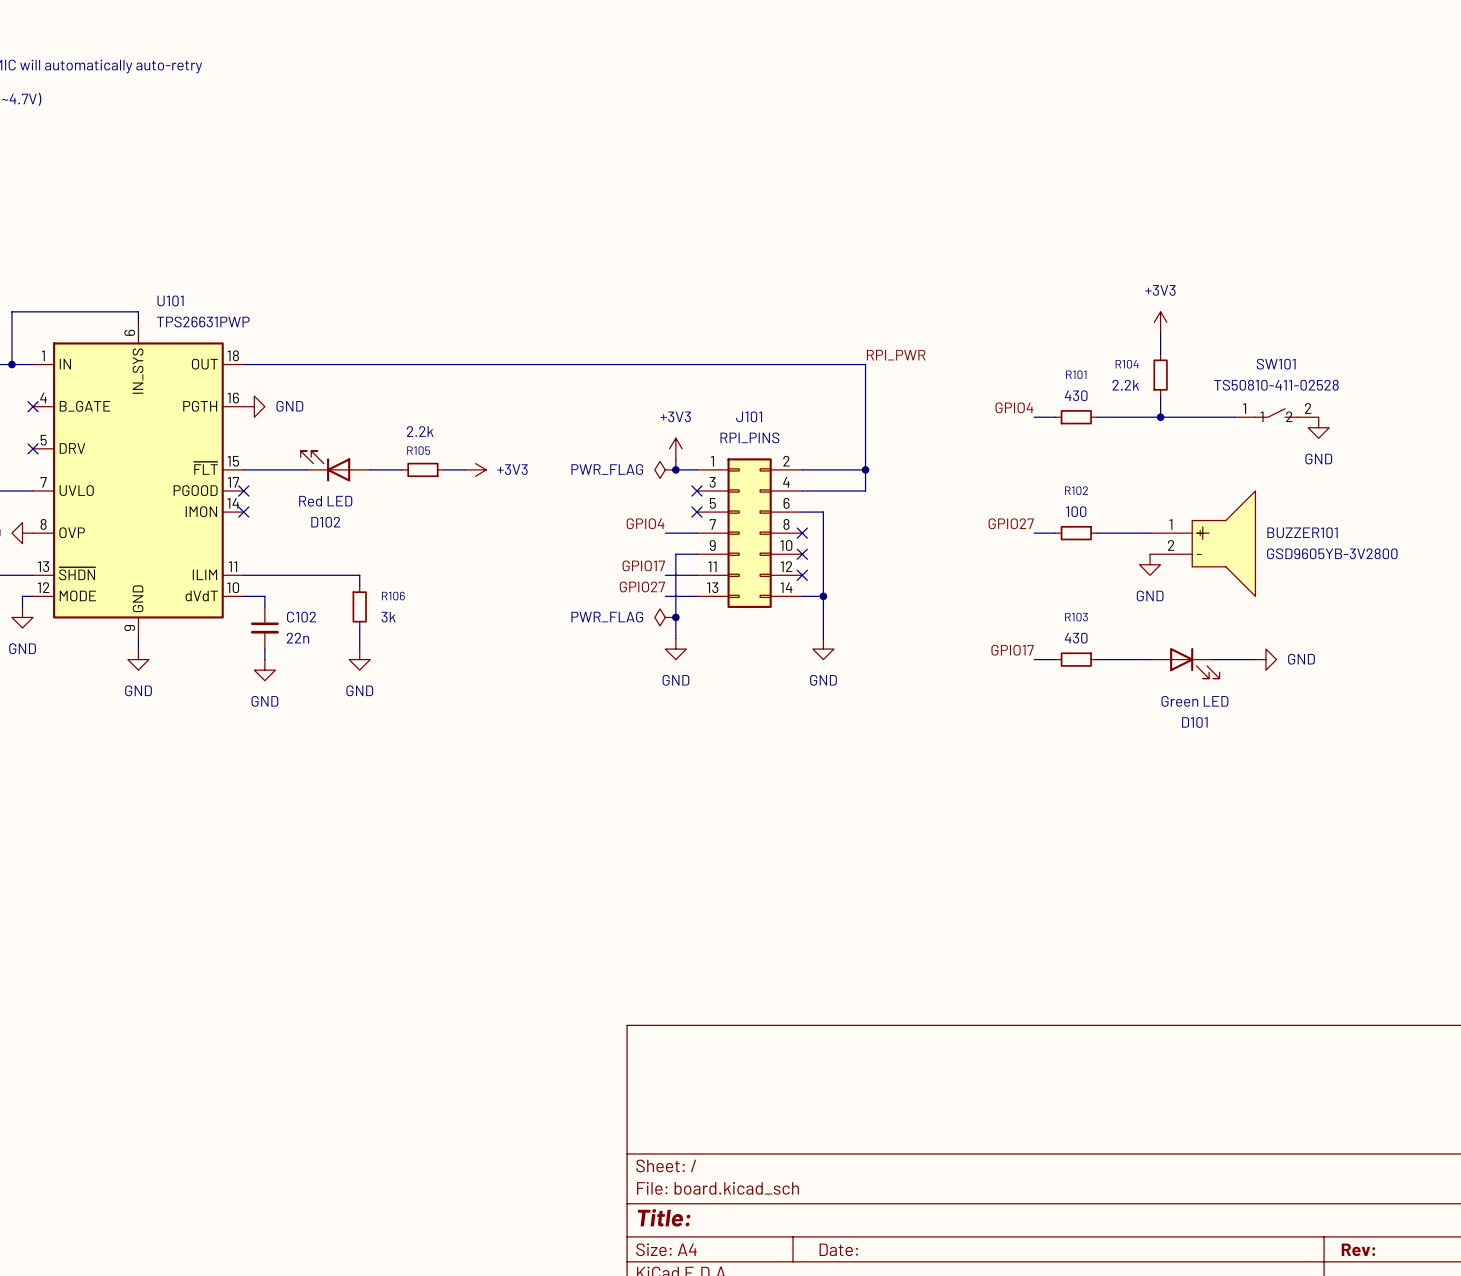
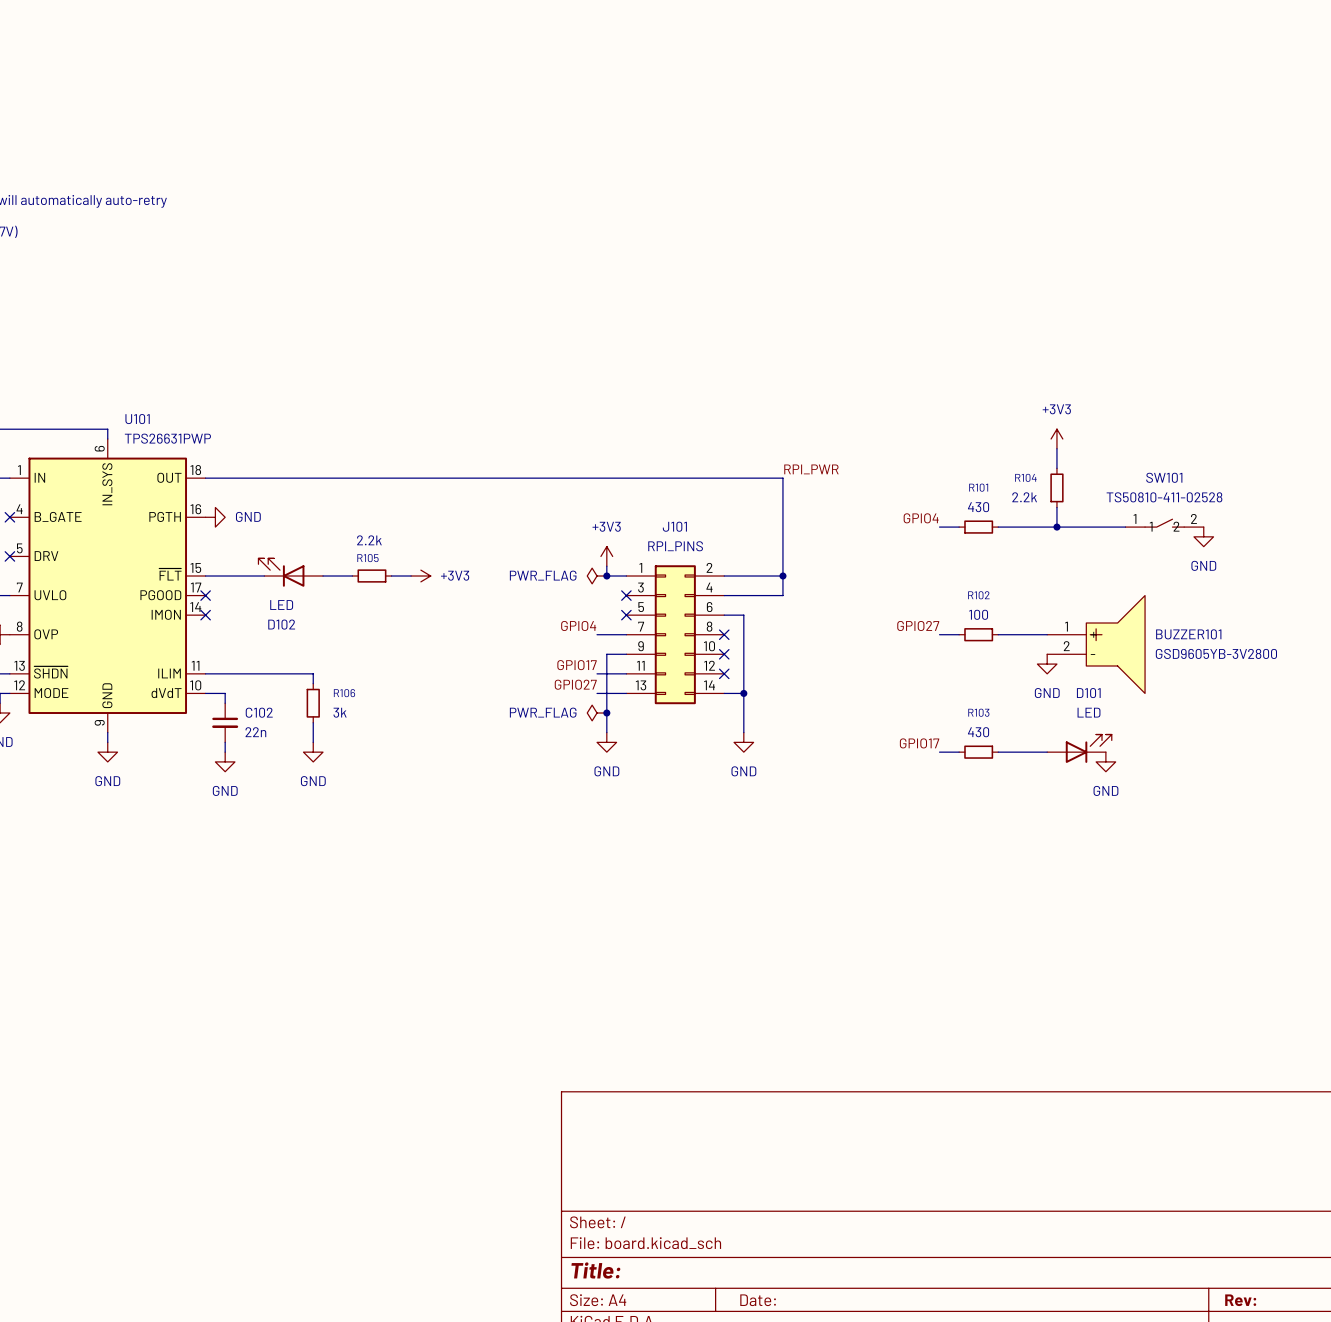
D102 value: Red LED (325, 501) -> LED (281, 604)
wire: (1213, 659) (1255, 659) -> none
power symbol rotation: 0° (1265, 659) -> 90° clockwise (1105, 761)
power symbol position: GND (1265, 659) -> GND (1105, 761)
D101 flip: as is (1194, 663) -> up-down (1088, 748)
D101 value: Green LED (1194, 701) -> LED (1088, 712)

